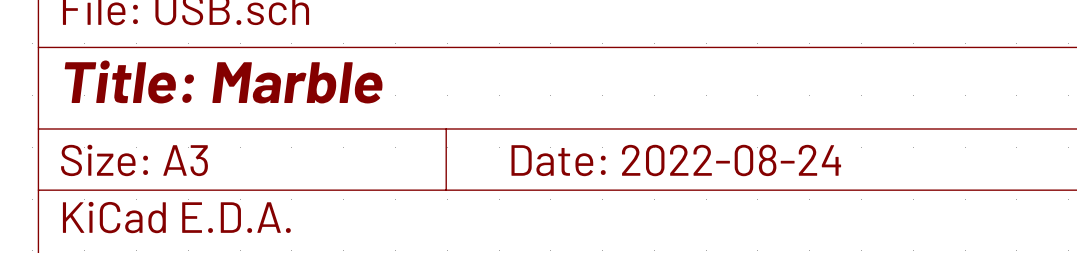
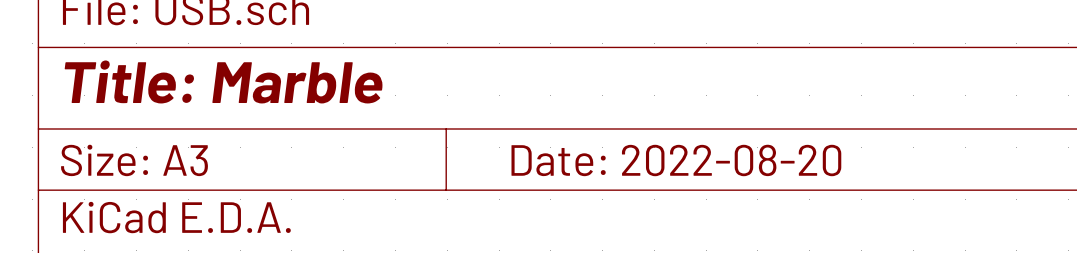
title block: Date: 2022-08-24 (676, 160) -> Date: 2022-08-20 (676, 160)

